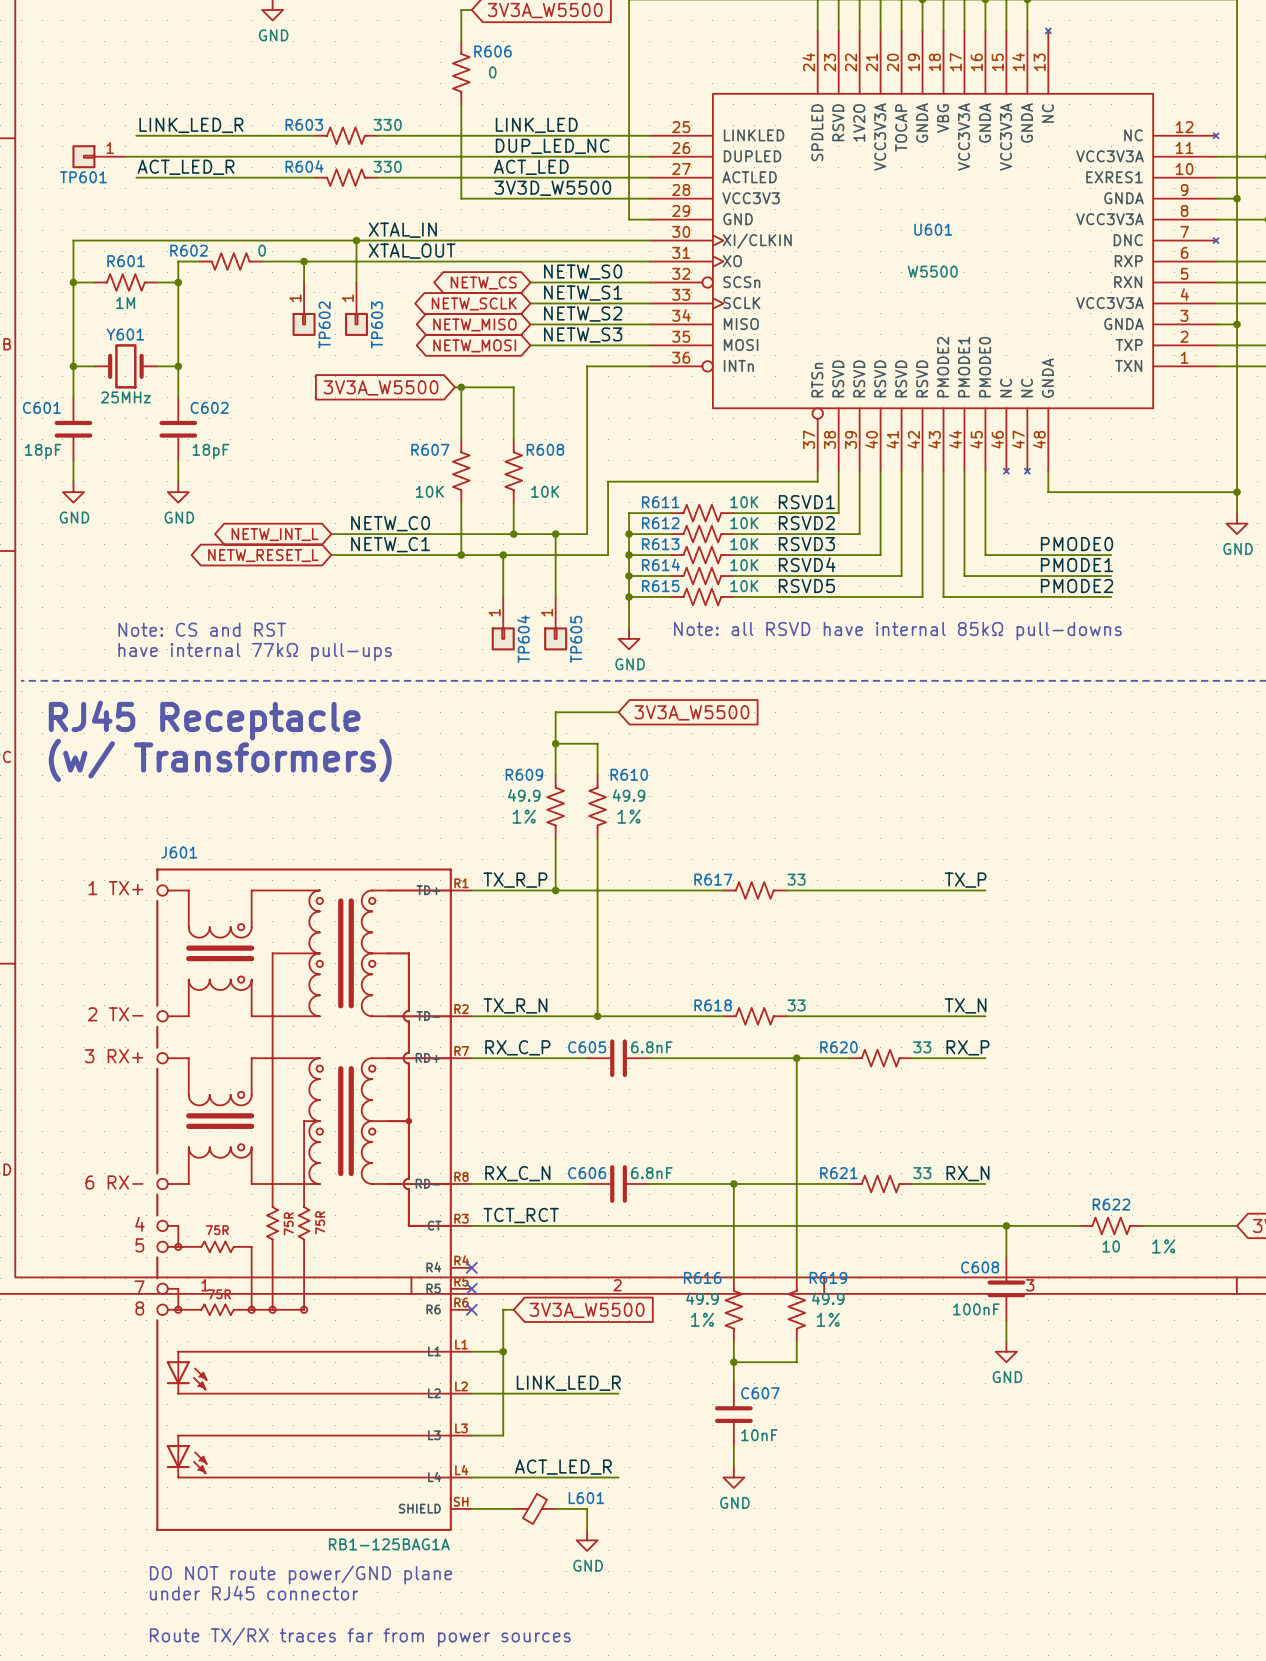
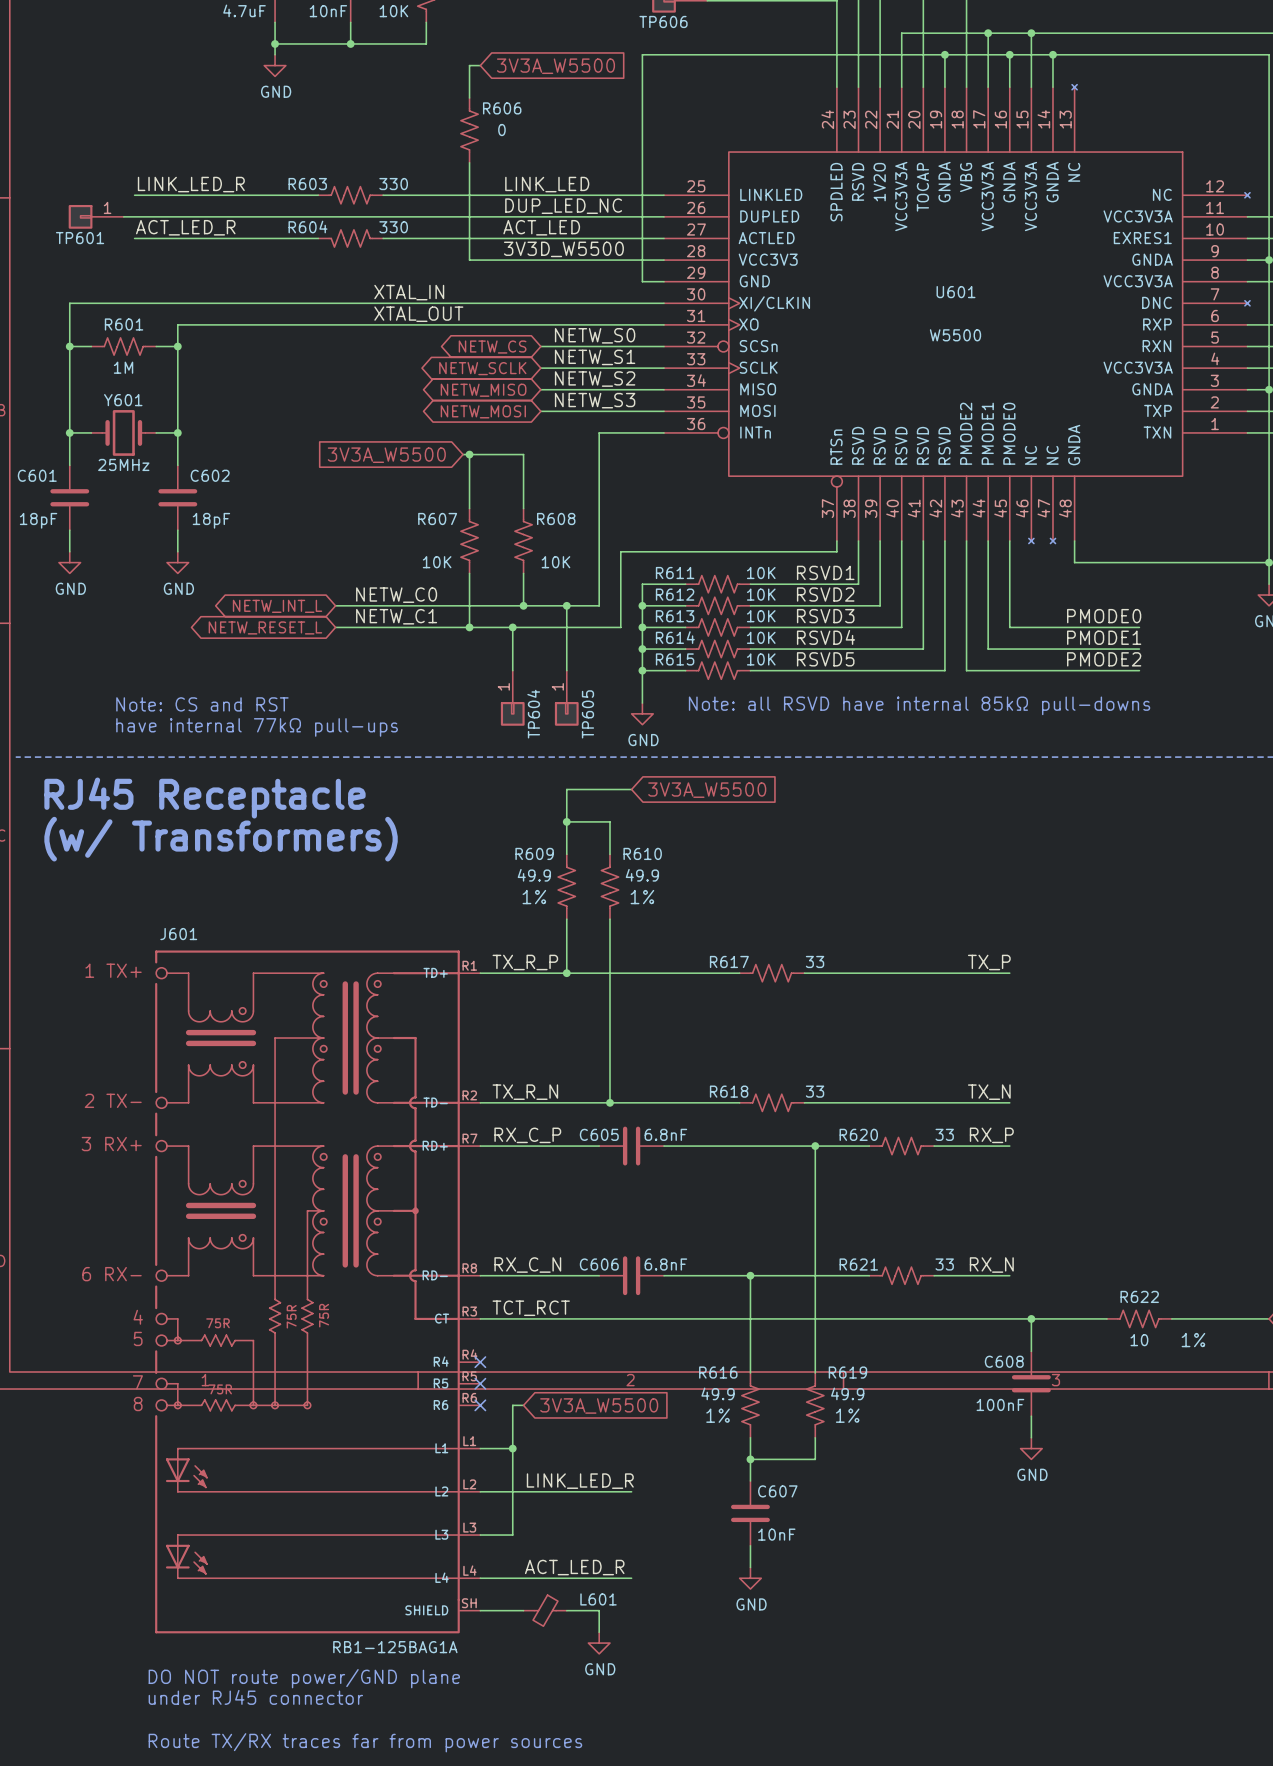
wire: (356, 240) (356, 282) -> none
junction: (356, 240) -> none
R602: 0 (230, 261) -> none
wire: (304, 261) (304, 282) -> none
junction: (304, 261) -> none
TP602: (304, 309) -> none
TP603: (356, 309) -> none

